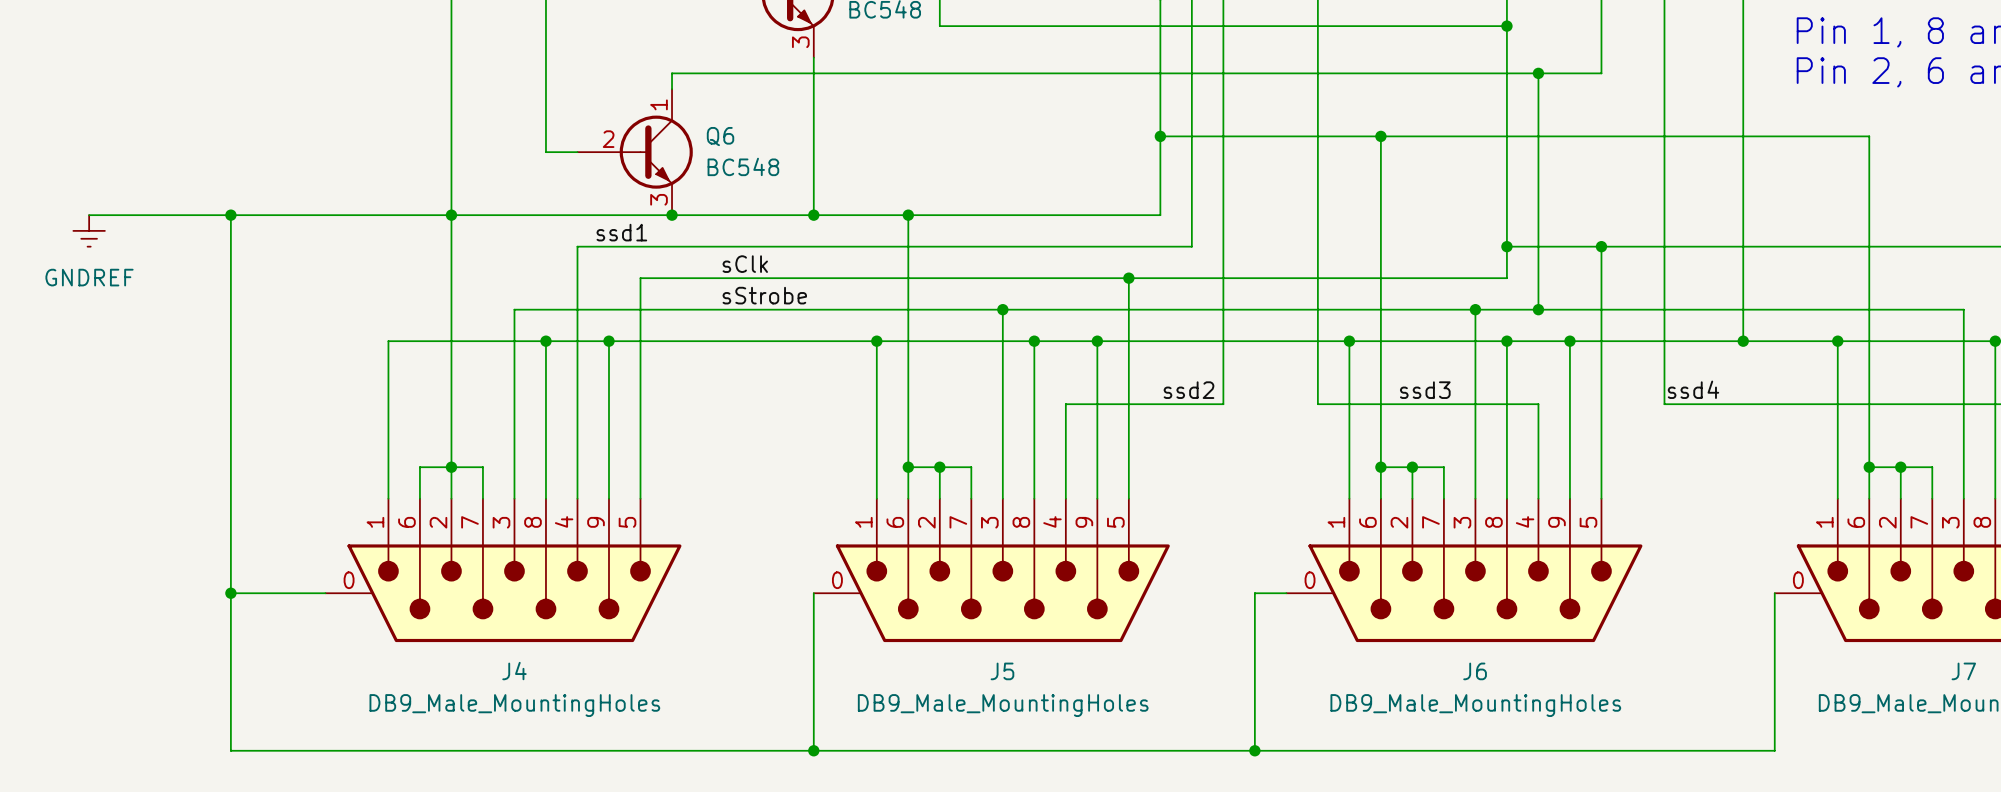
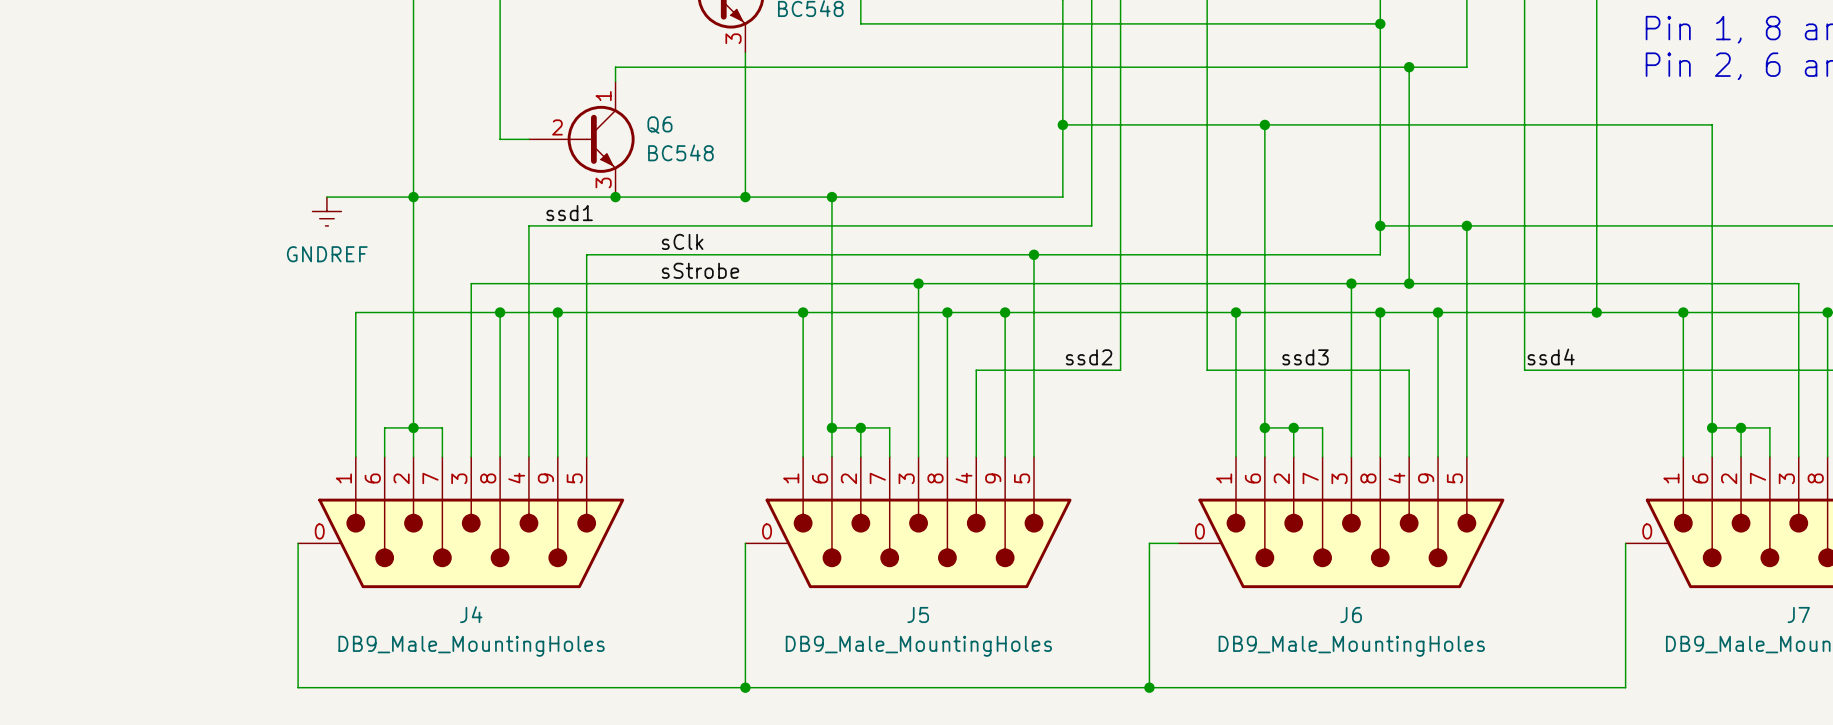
wire: (89, 215) (356, 215) -> none
wire: (230, 215) (230, 750) (325, 750) -> none
junction: (230, 215) -> none
power symbol position: GNDREF (89, 230) -> GNDREF (326, 211)
wire: (230, 593) (325, 593) -> (298, 687) (298, 543)
junction: (230, 593) -> none

